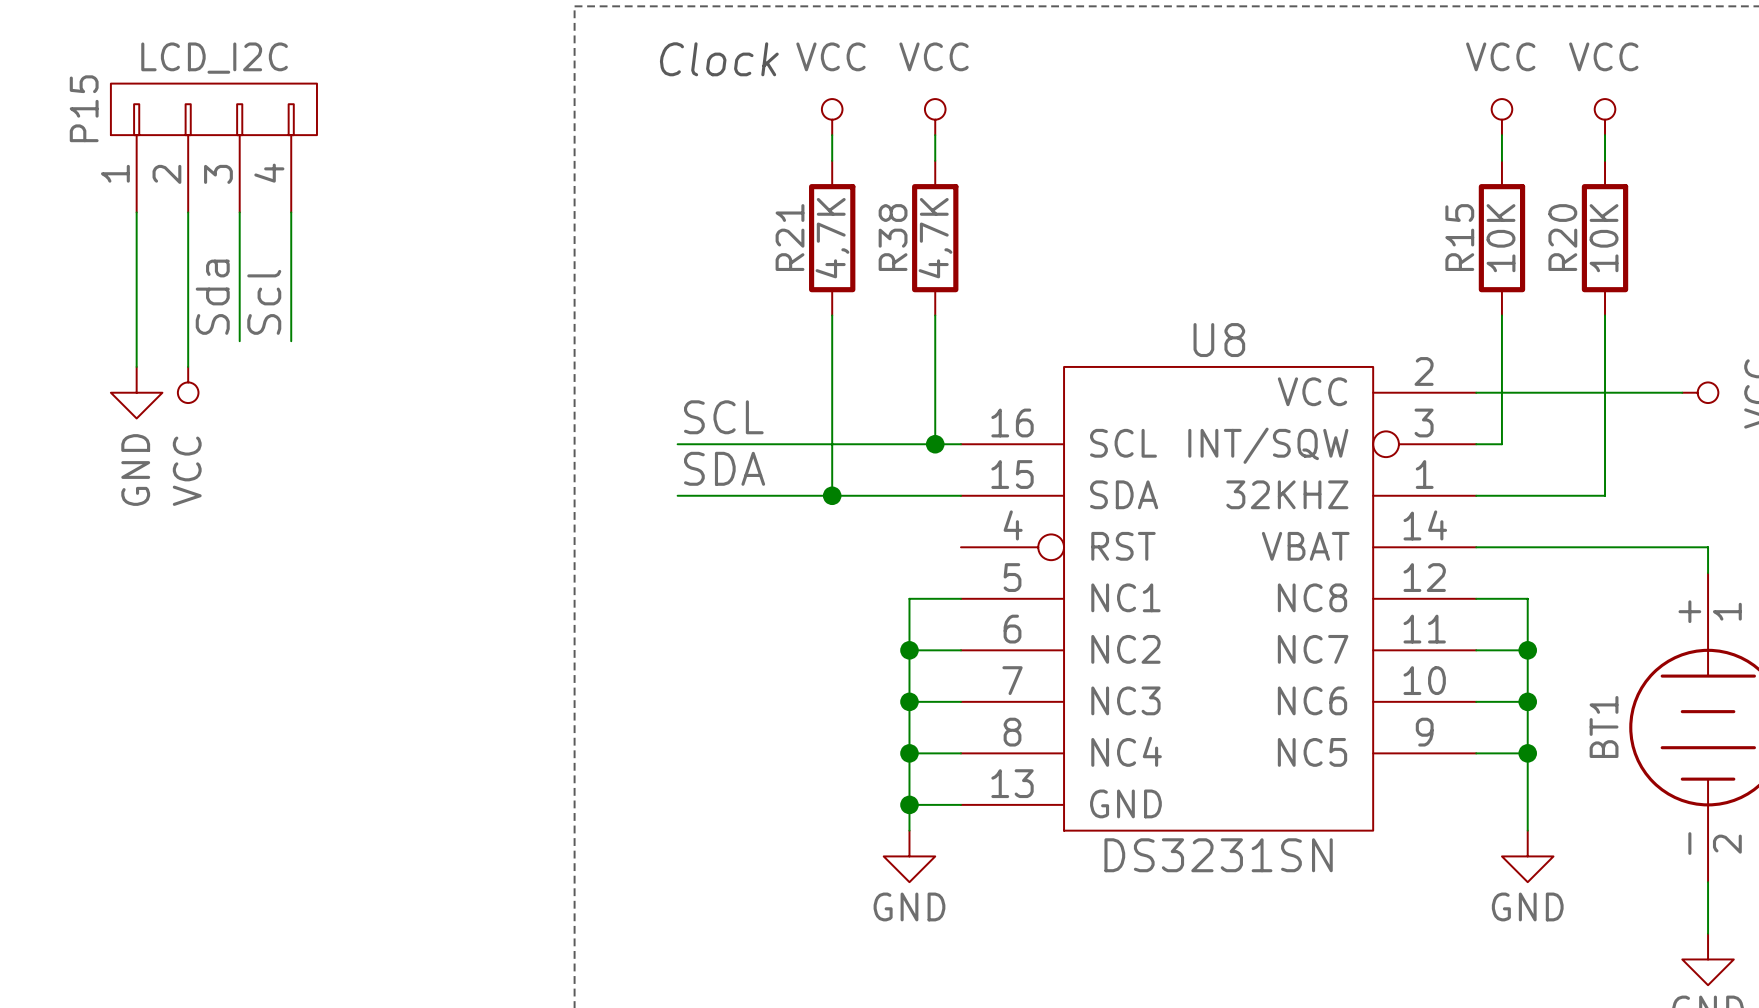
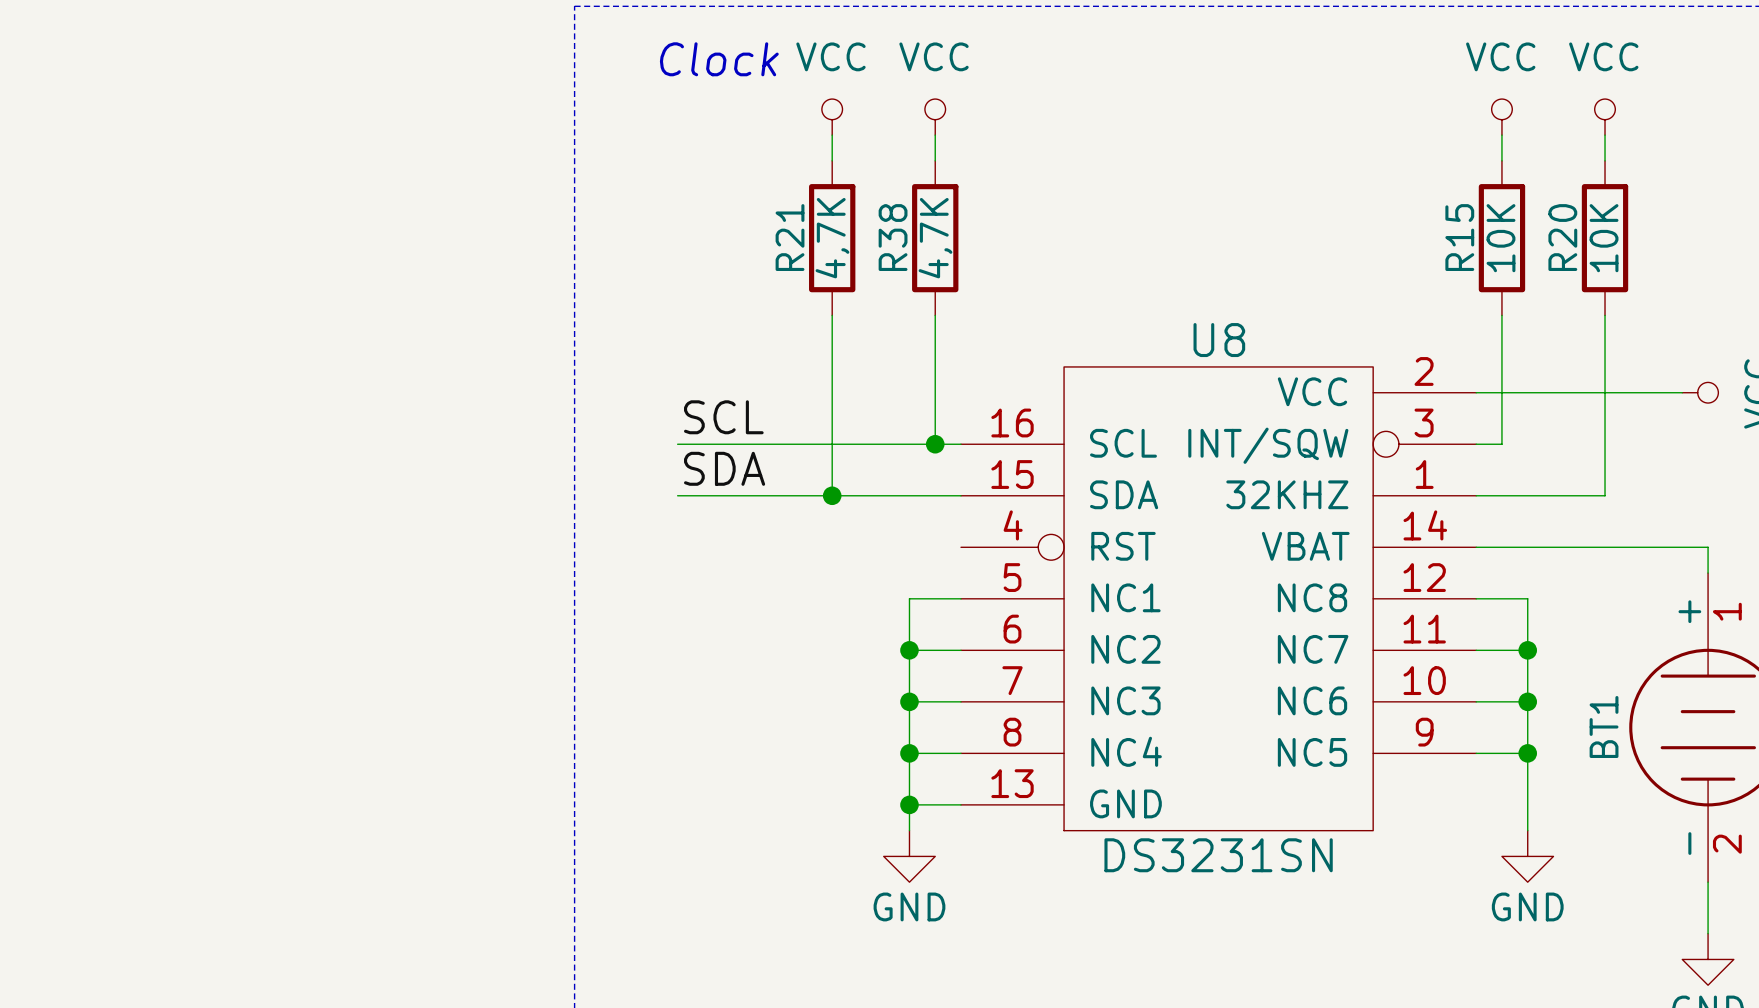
P15: LCD_I2C (213, 148) -> none
wire: (136, 212) (136, 366) -> none
wire: (188, 212) (188, 366) -> none
wire: (239, 212) (239, 341) -> none
wire: (291, 212) (291, 341) -> none
label: Sda (212, 297) -> none
label: Scl (264, 302) -> none
power symbol: VCC (188, 385) -> none
power symbol: GND (136, 392) -> none

